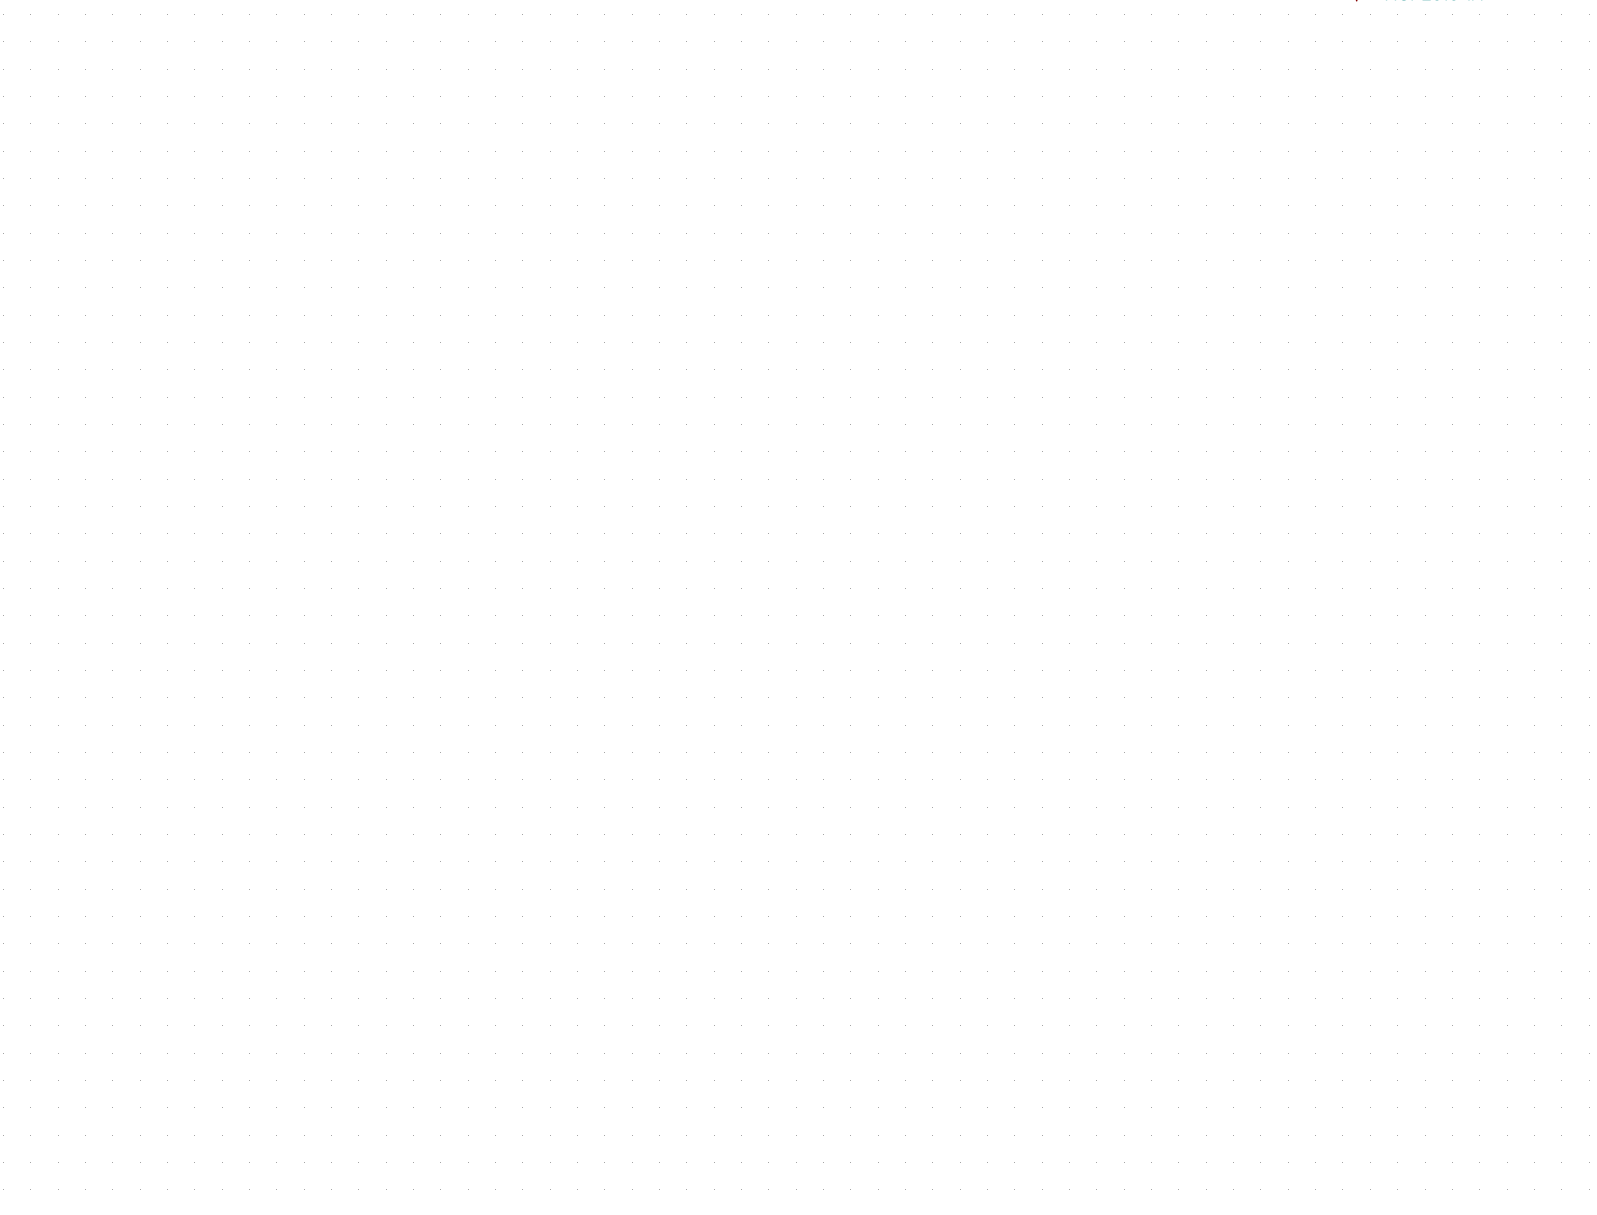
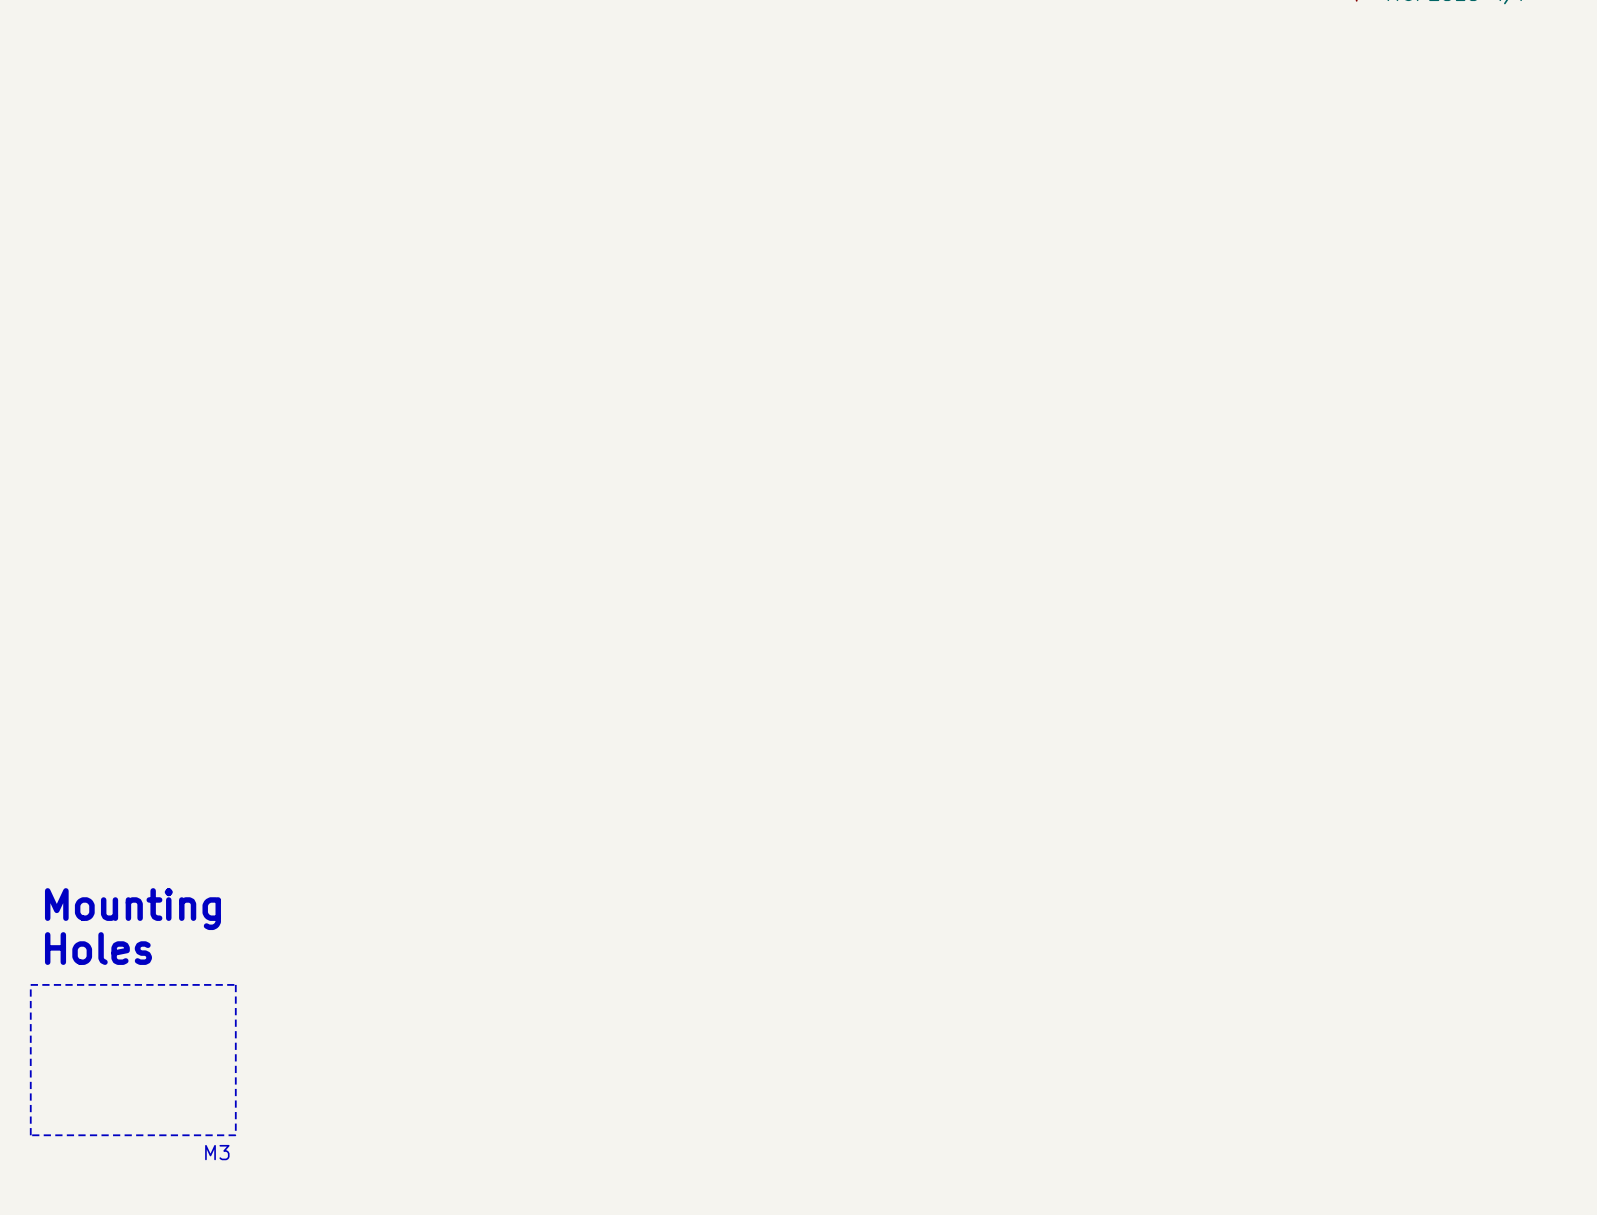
text: none -> Mounting (132, 909)
text: none -> Holes (98, 948)
line: none -> (30, 984) (235, 984) (235, 1135) (30, 1135) (30, 984)
text: none -> M3 (217, 1152)

